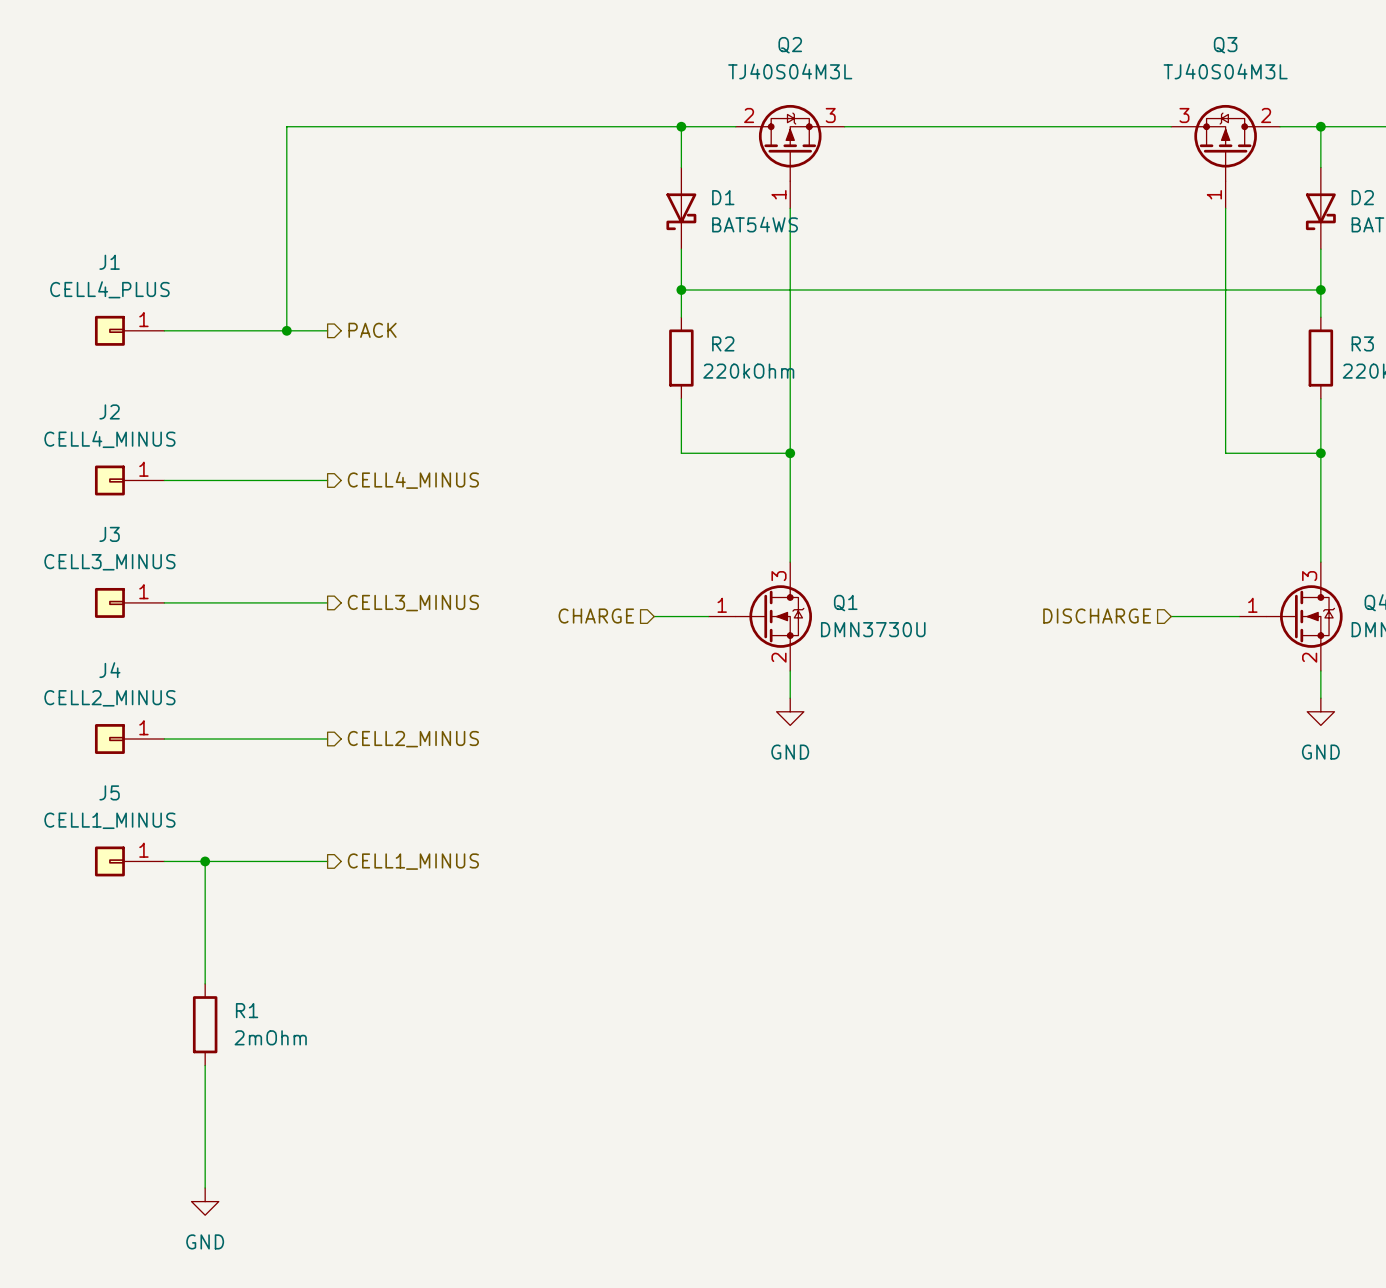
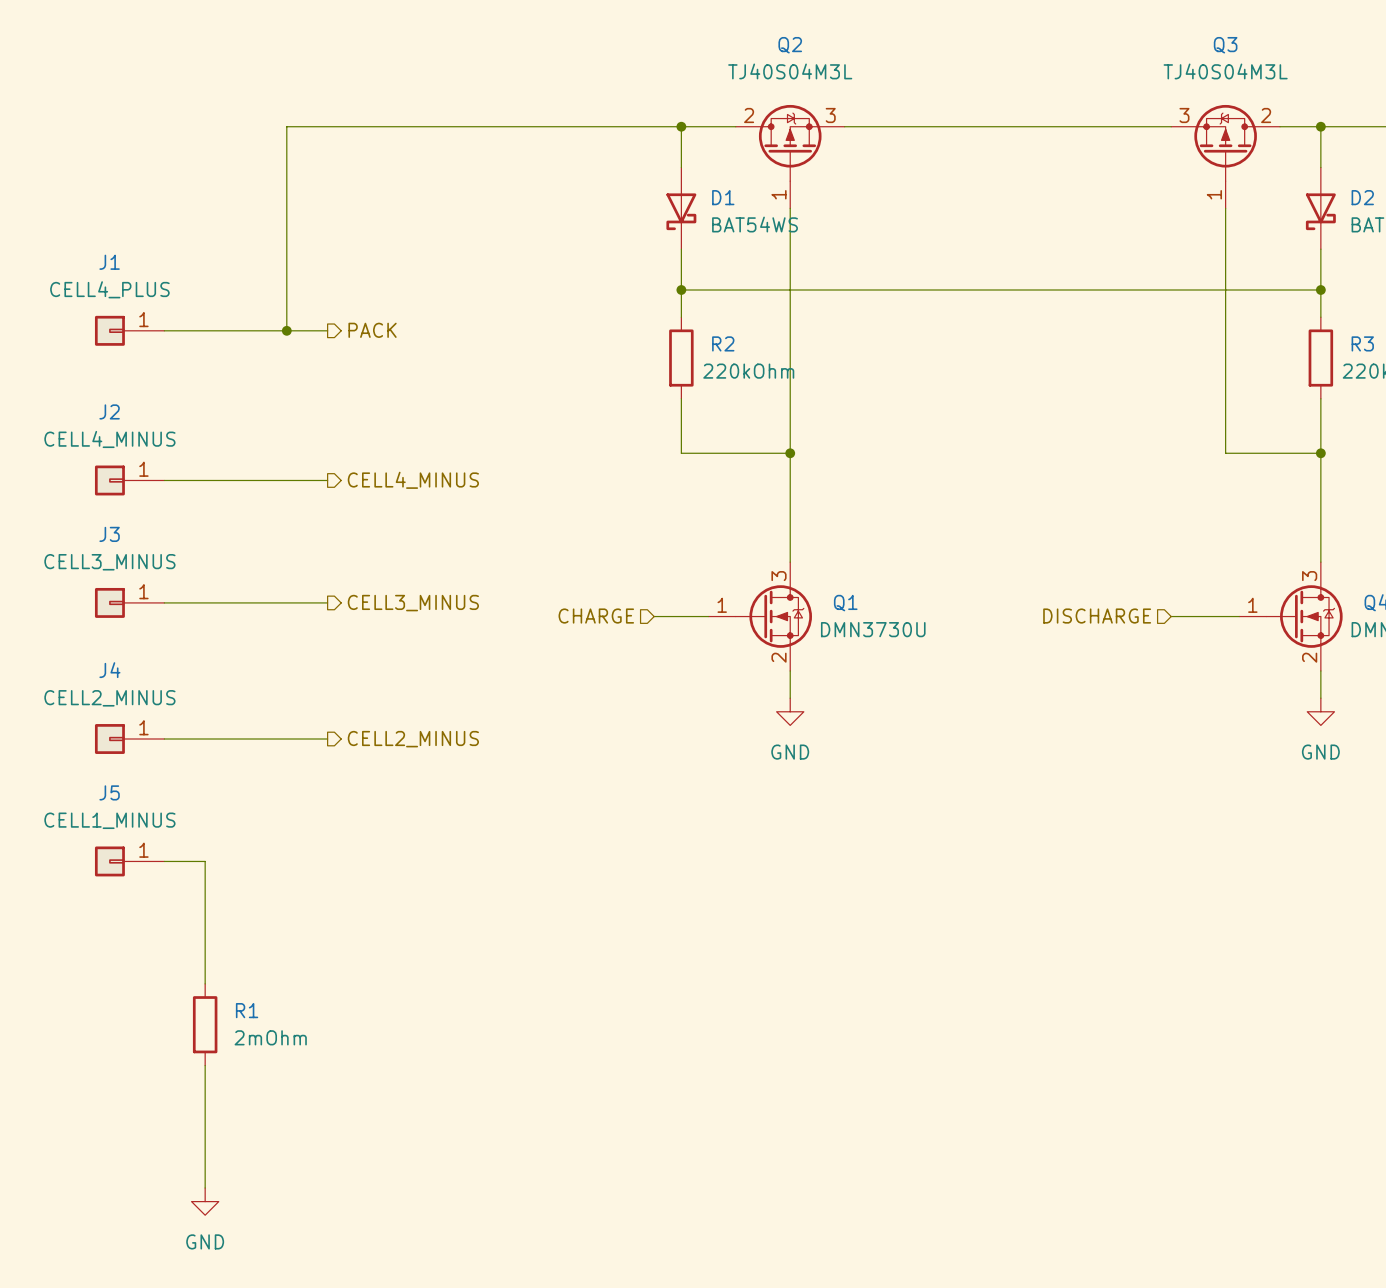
wire: (205, 861) (327, 861) -> none
junction: (205, 861) -> none
hierarchical label: CELL1_MINUS (413, 861) -> none

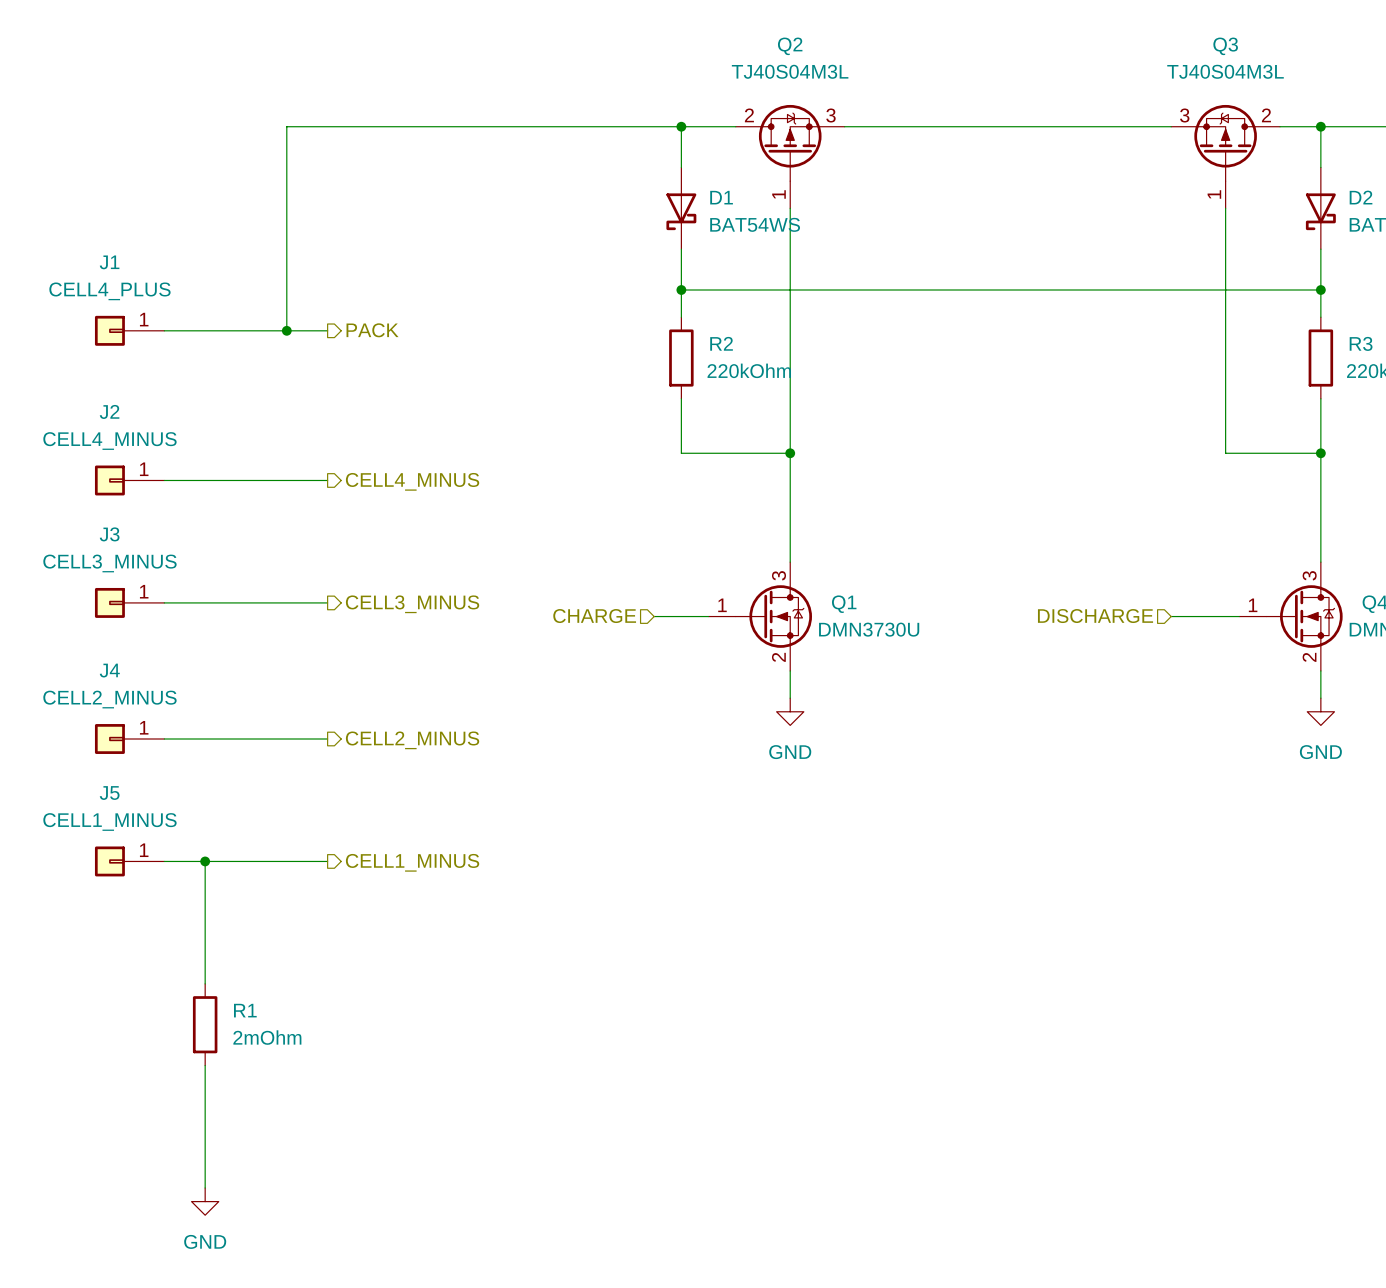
wire: none -> (205, 861) (327, 861)
junction: none -> (205, 861)
hierarchical label: none -> CELL1_MINUS (412, 862)

